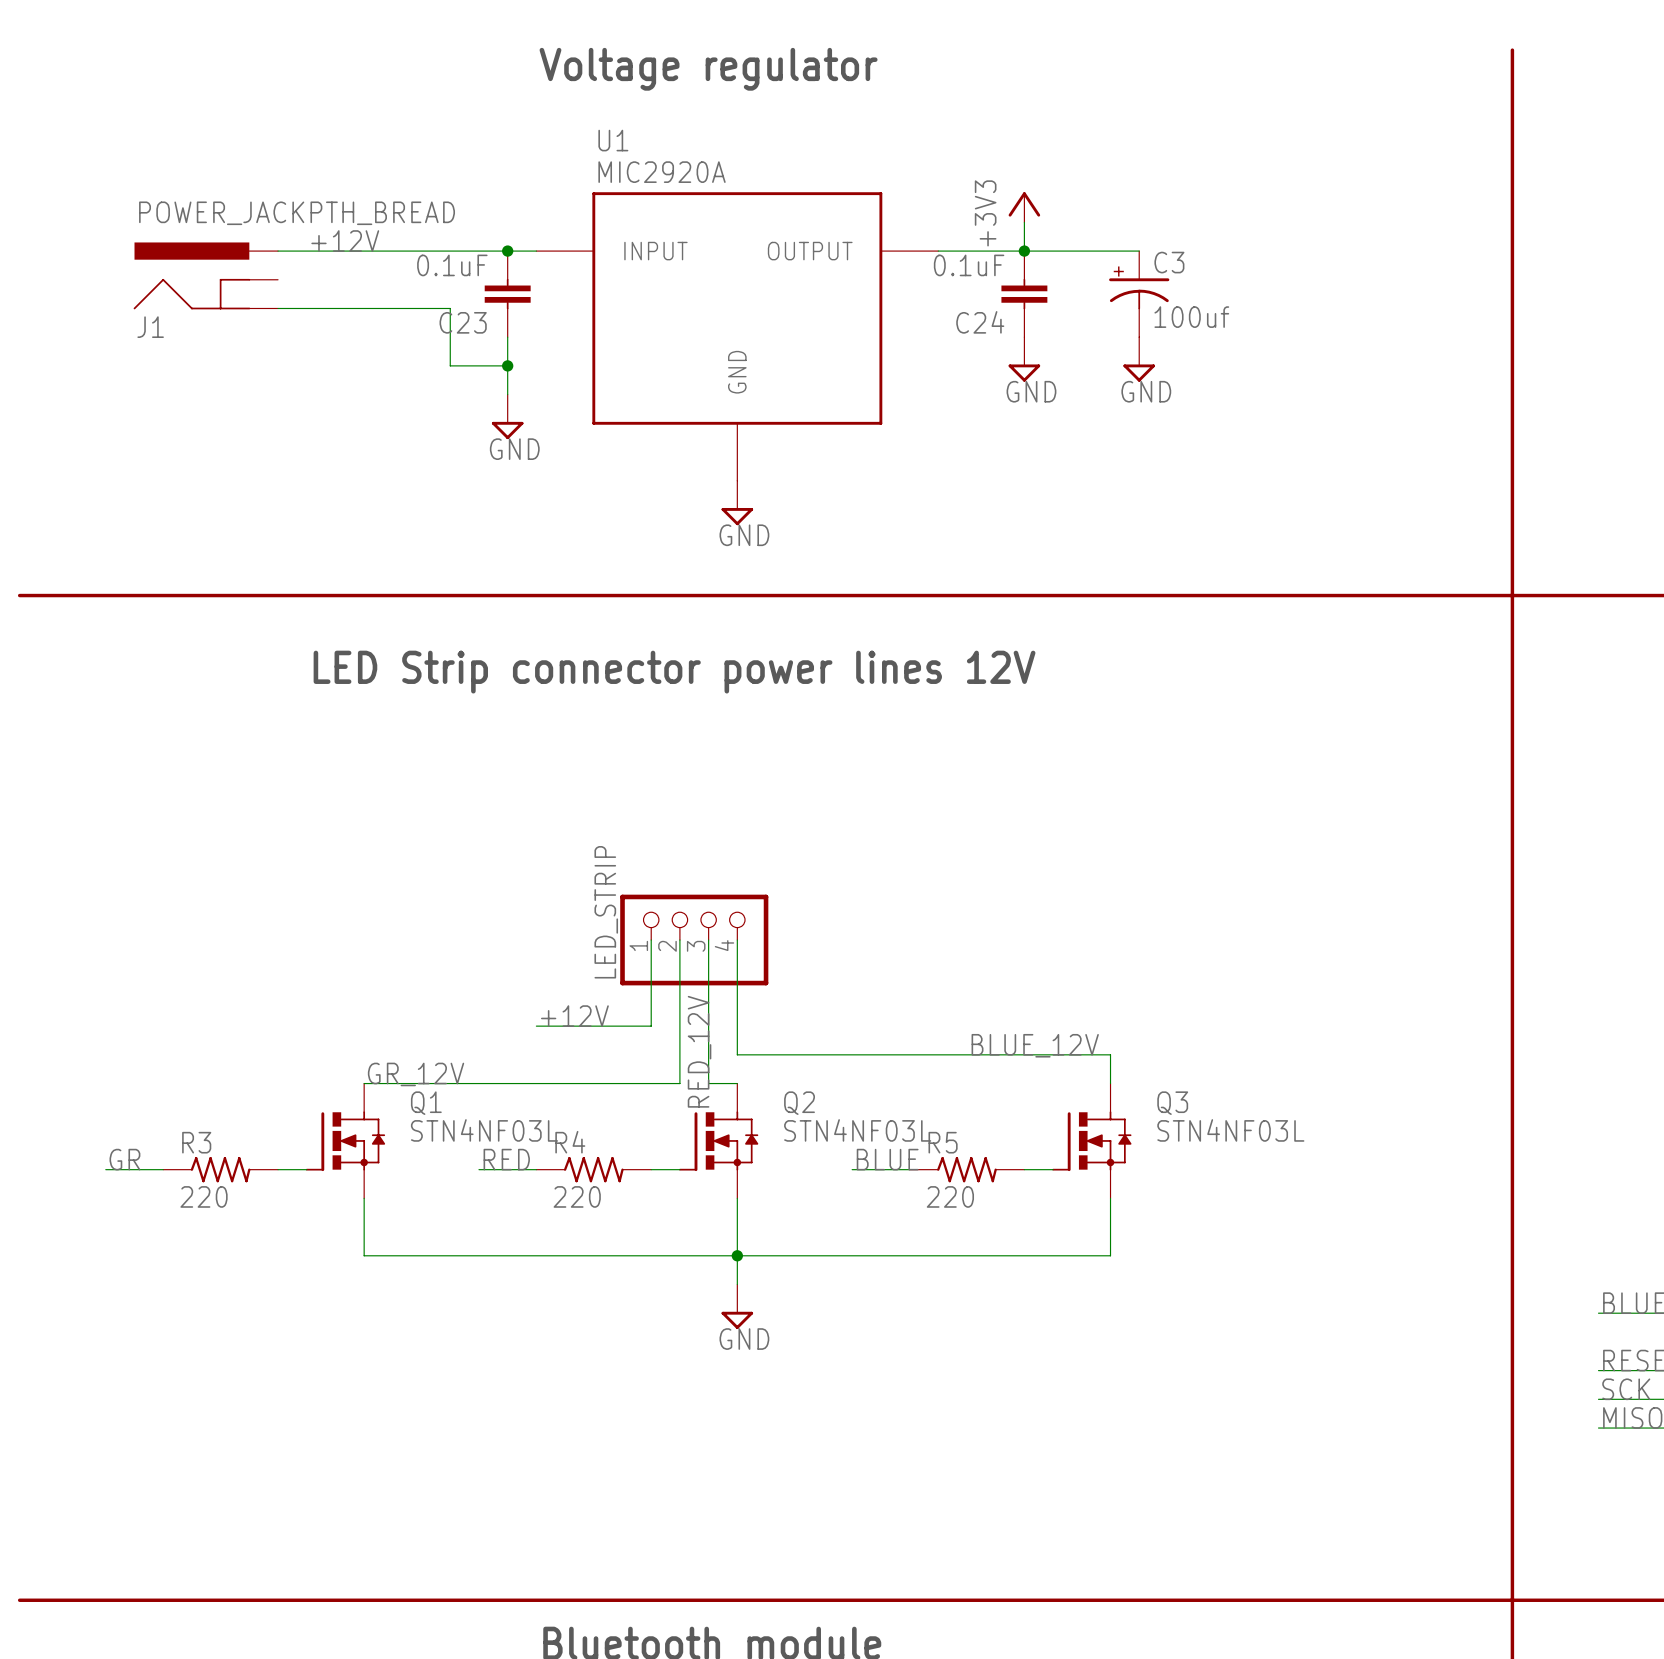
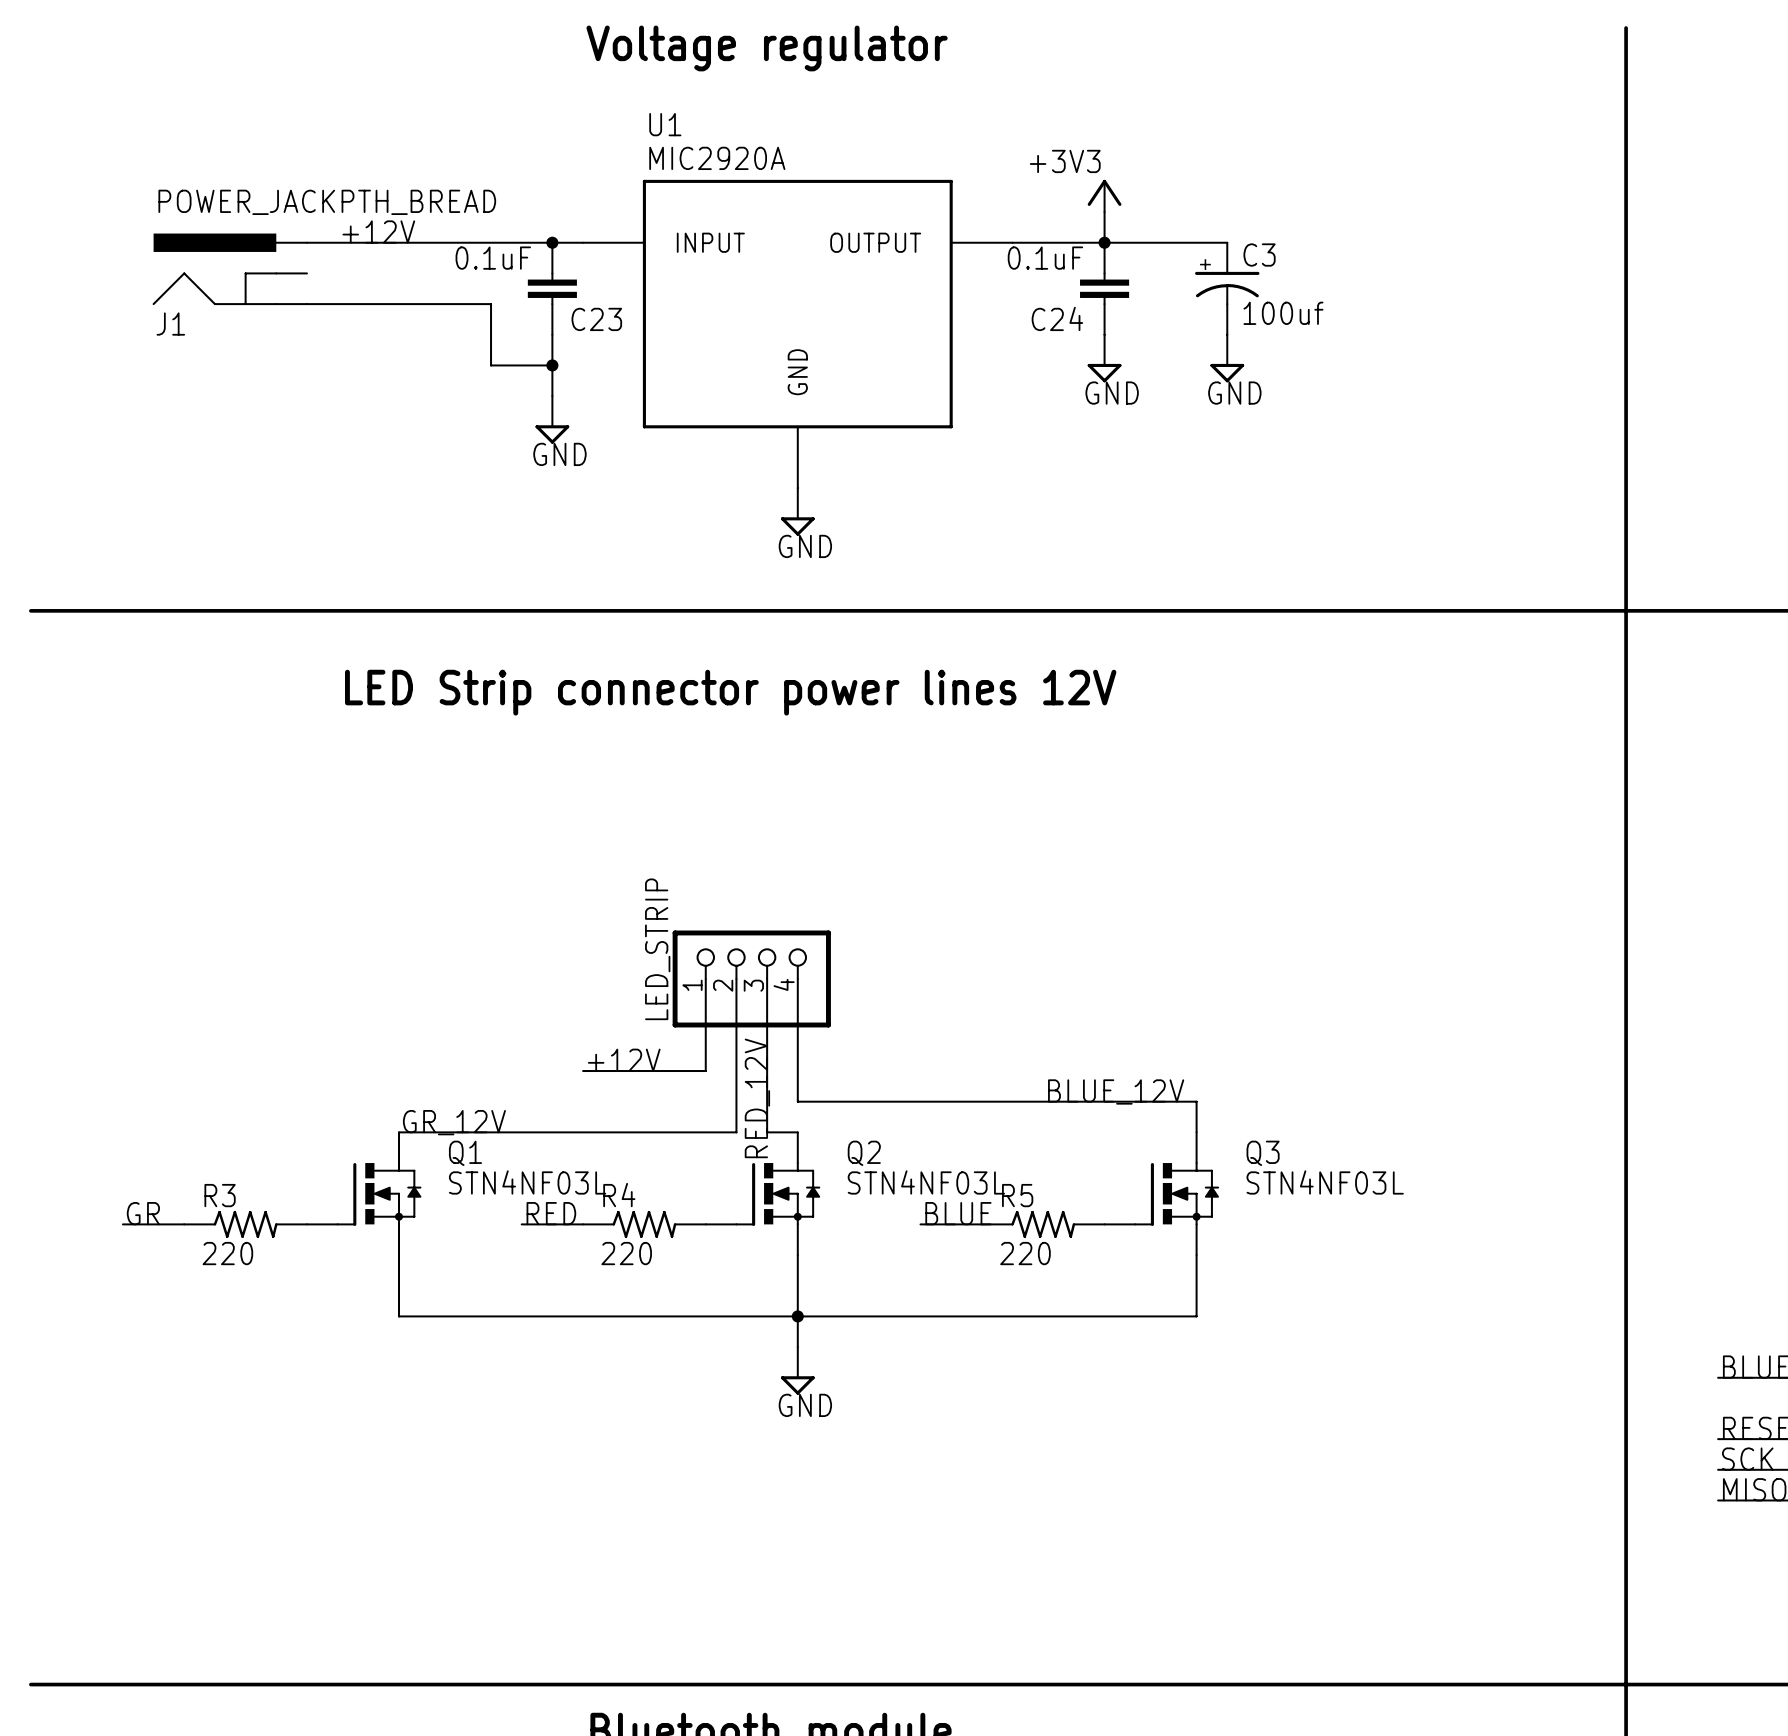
power symbol text rotation: 0° (985, 213) -> 90° clockwise (1065, 161)
C23 name position: C23 (463, 322) -> C23 (596, 319)

